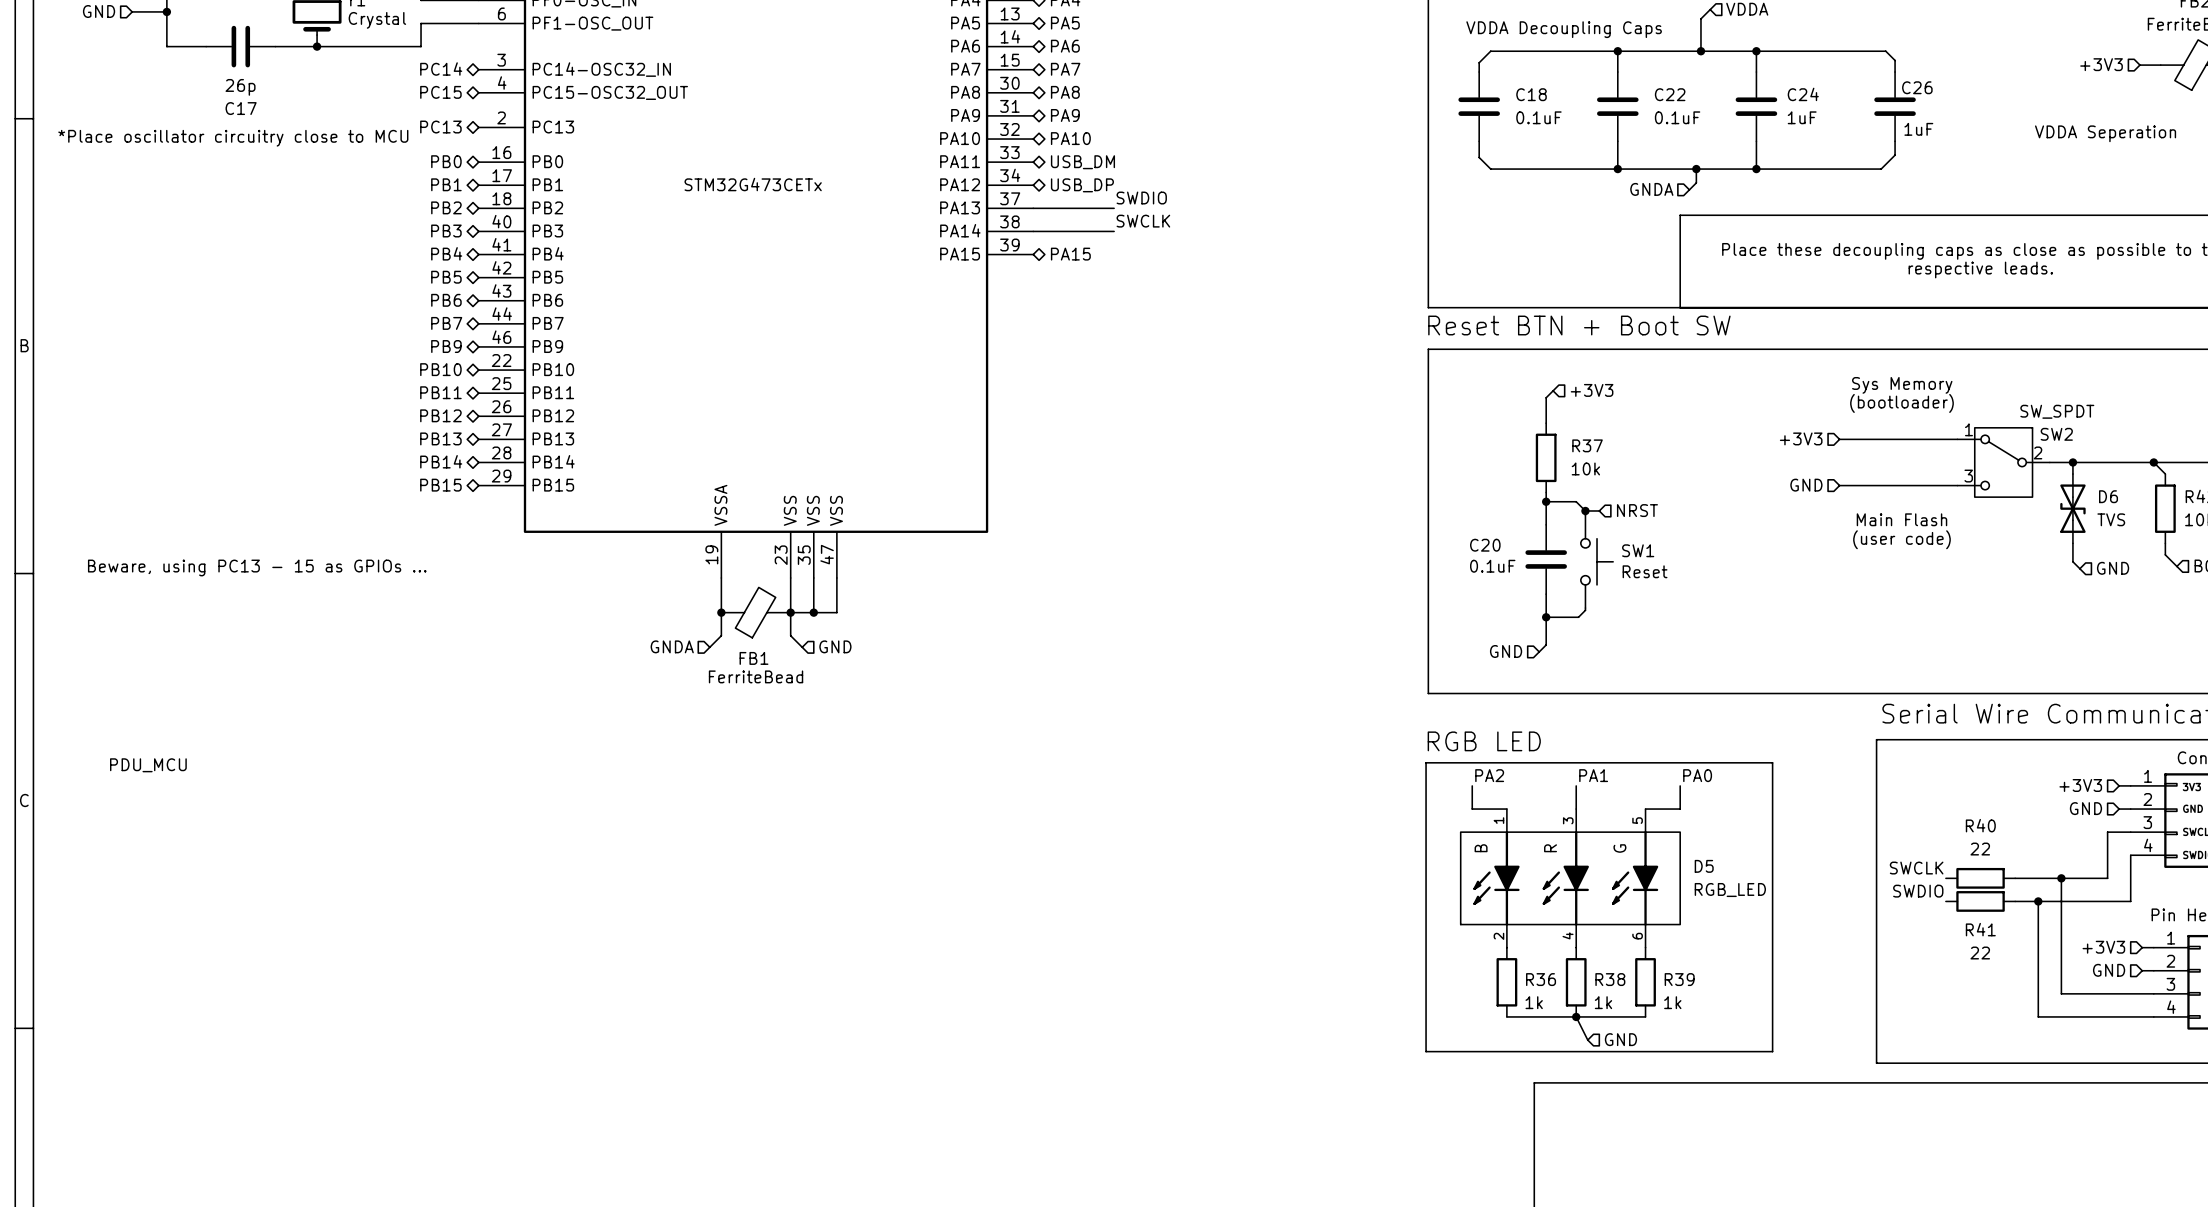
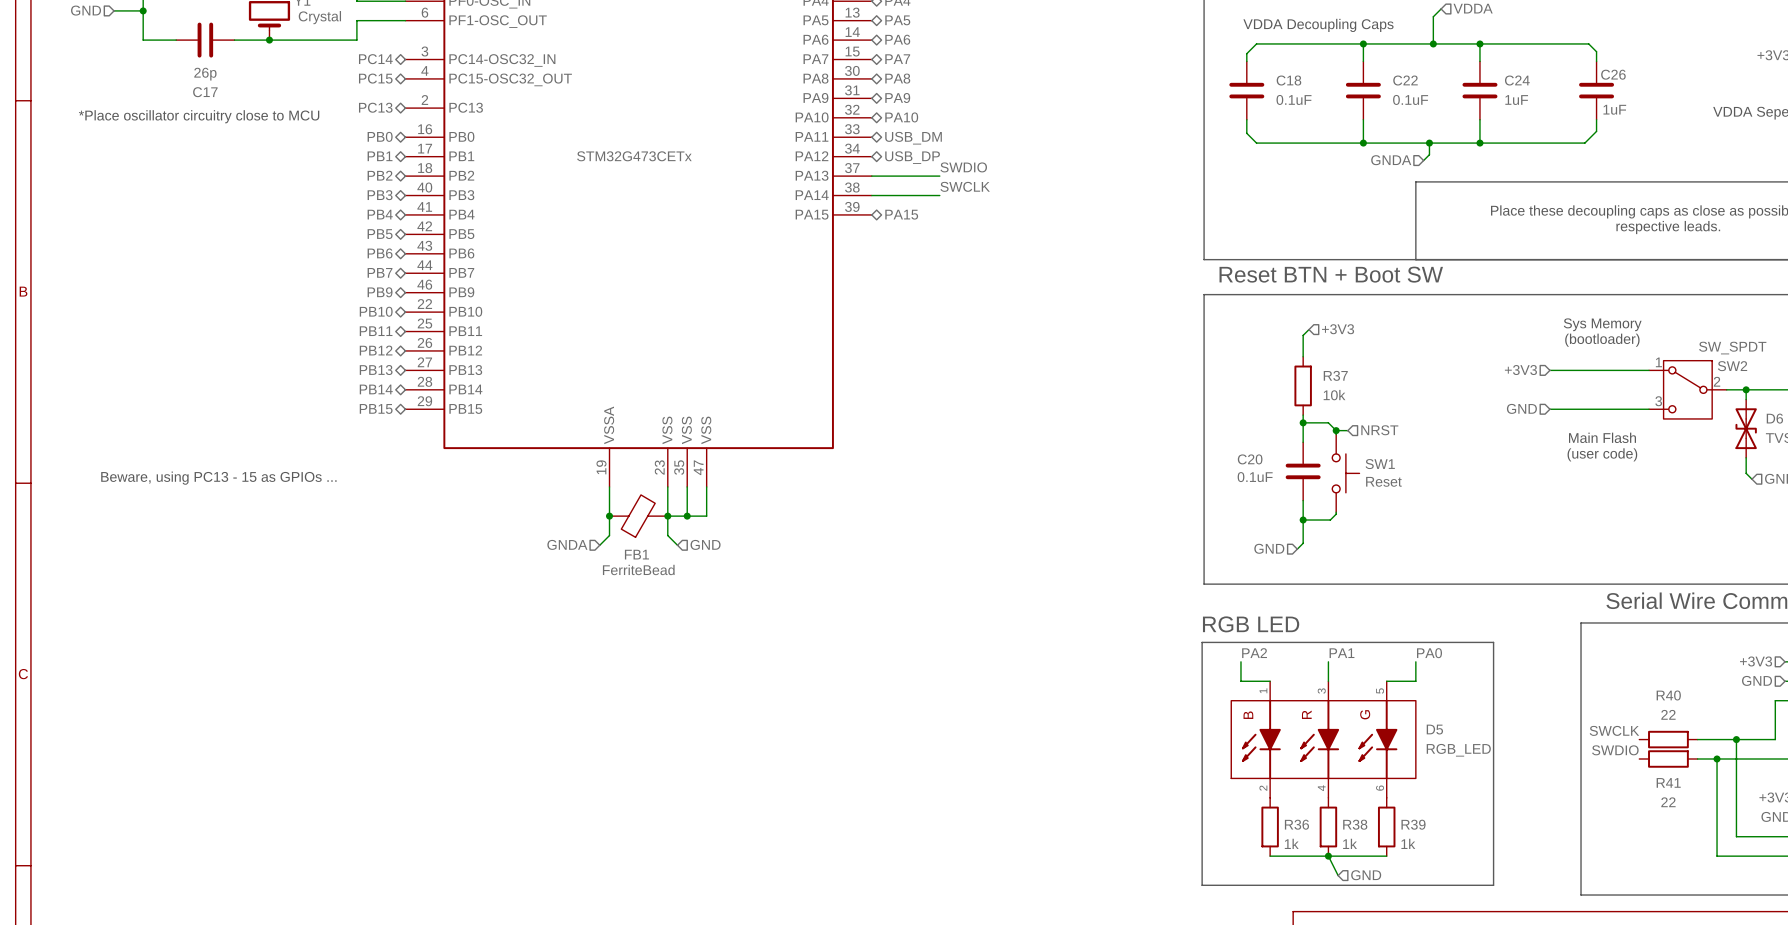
text: PDU_MCU (148, 765) -> none

